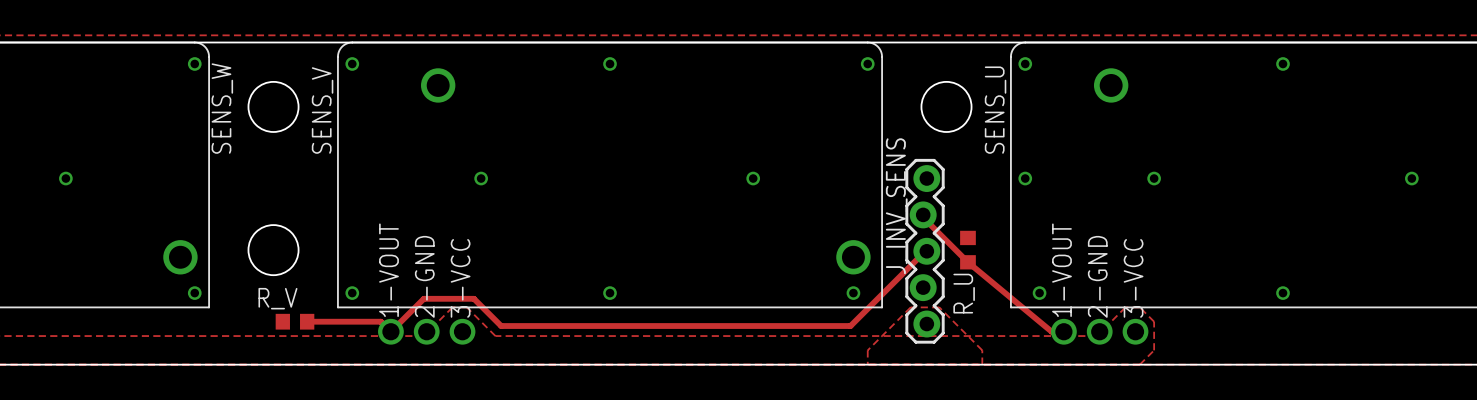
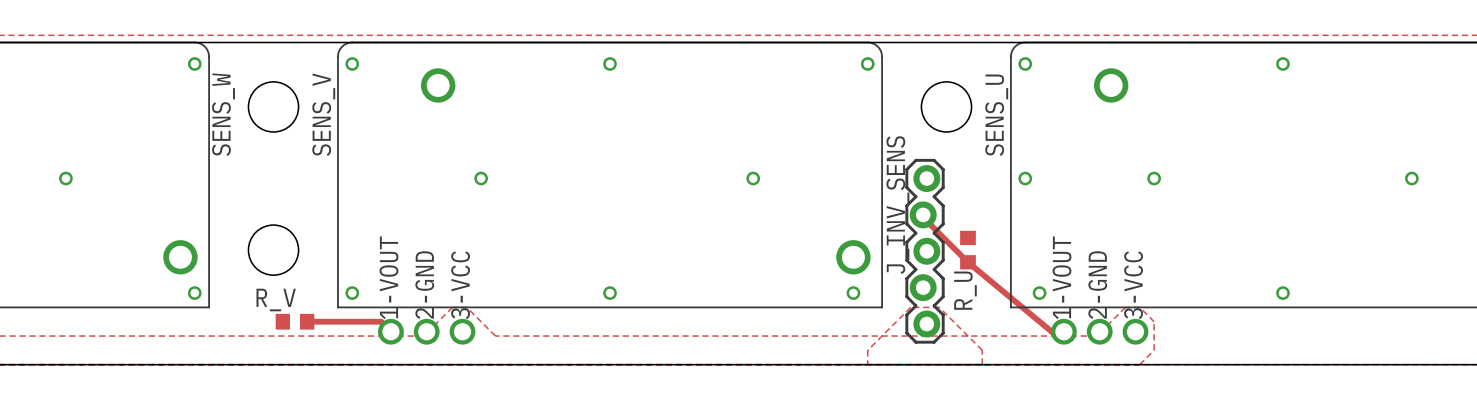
track: (926, 251) (850, 326) (501, 326) (473, 298) (423, 298) (390, 331) -> none

